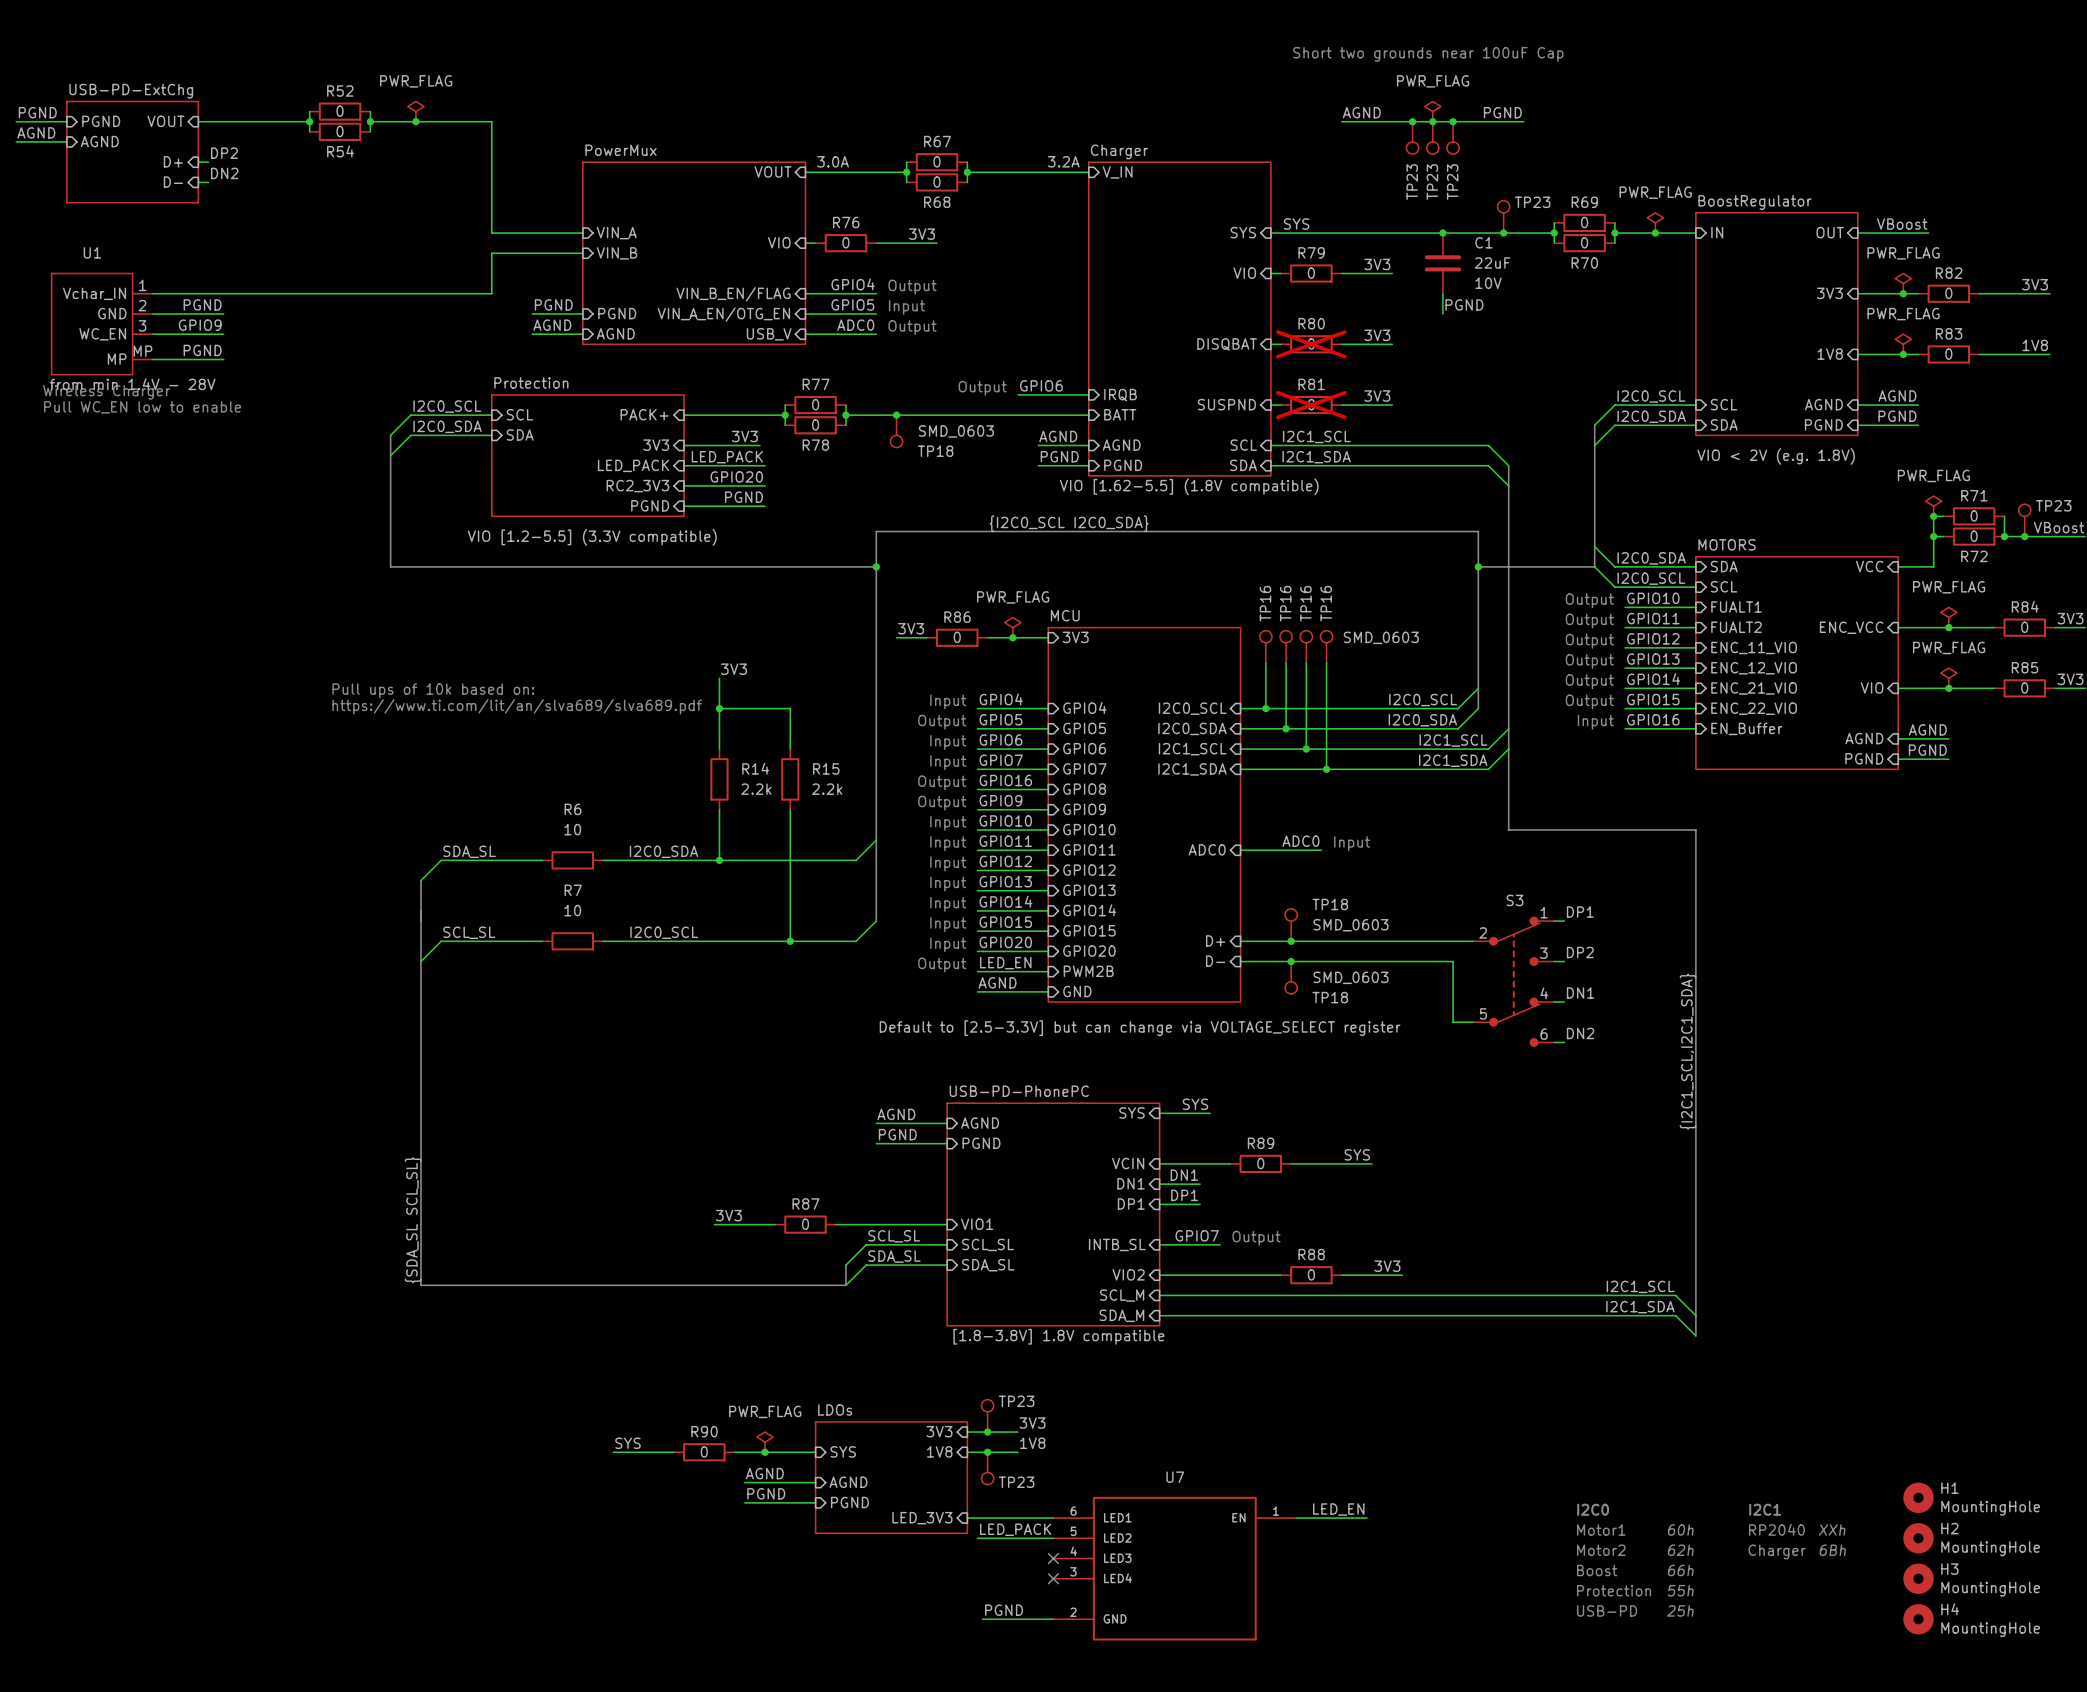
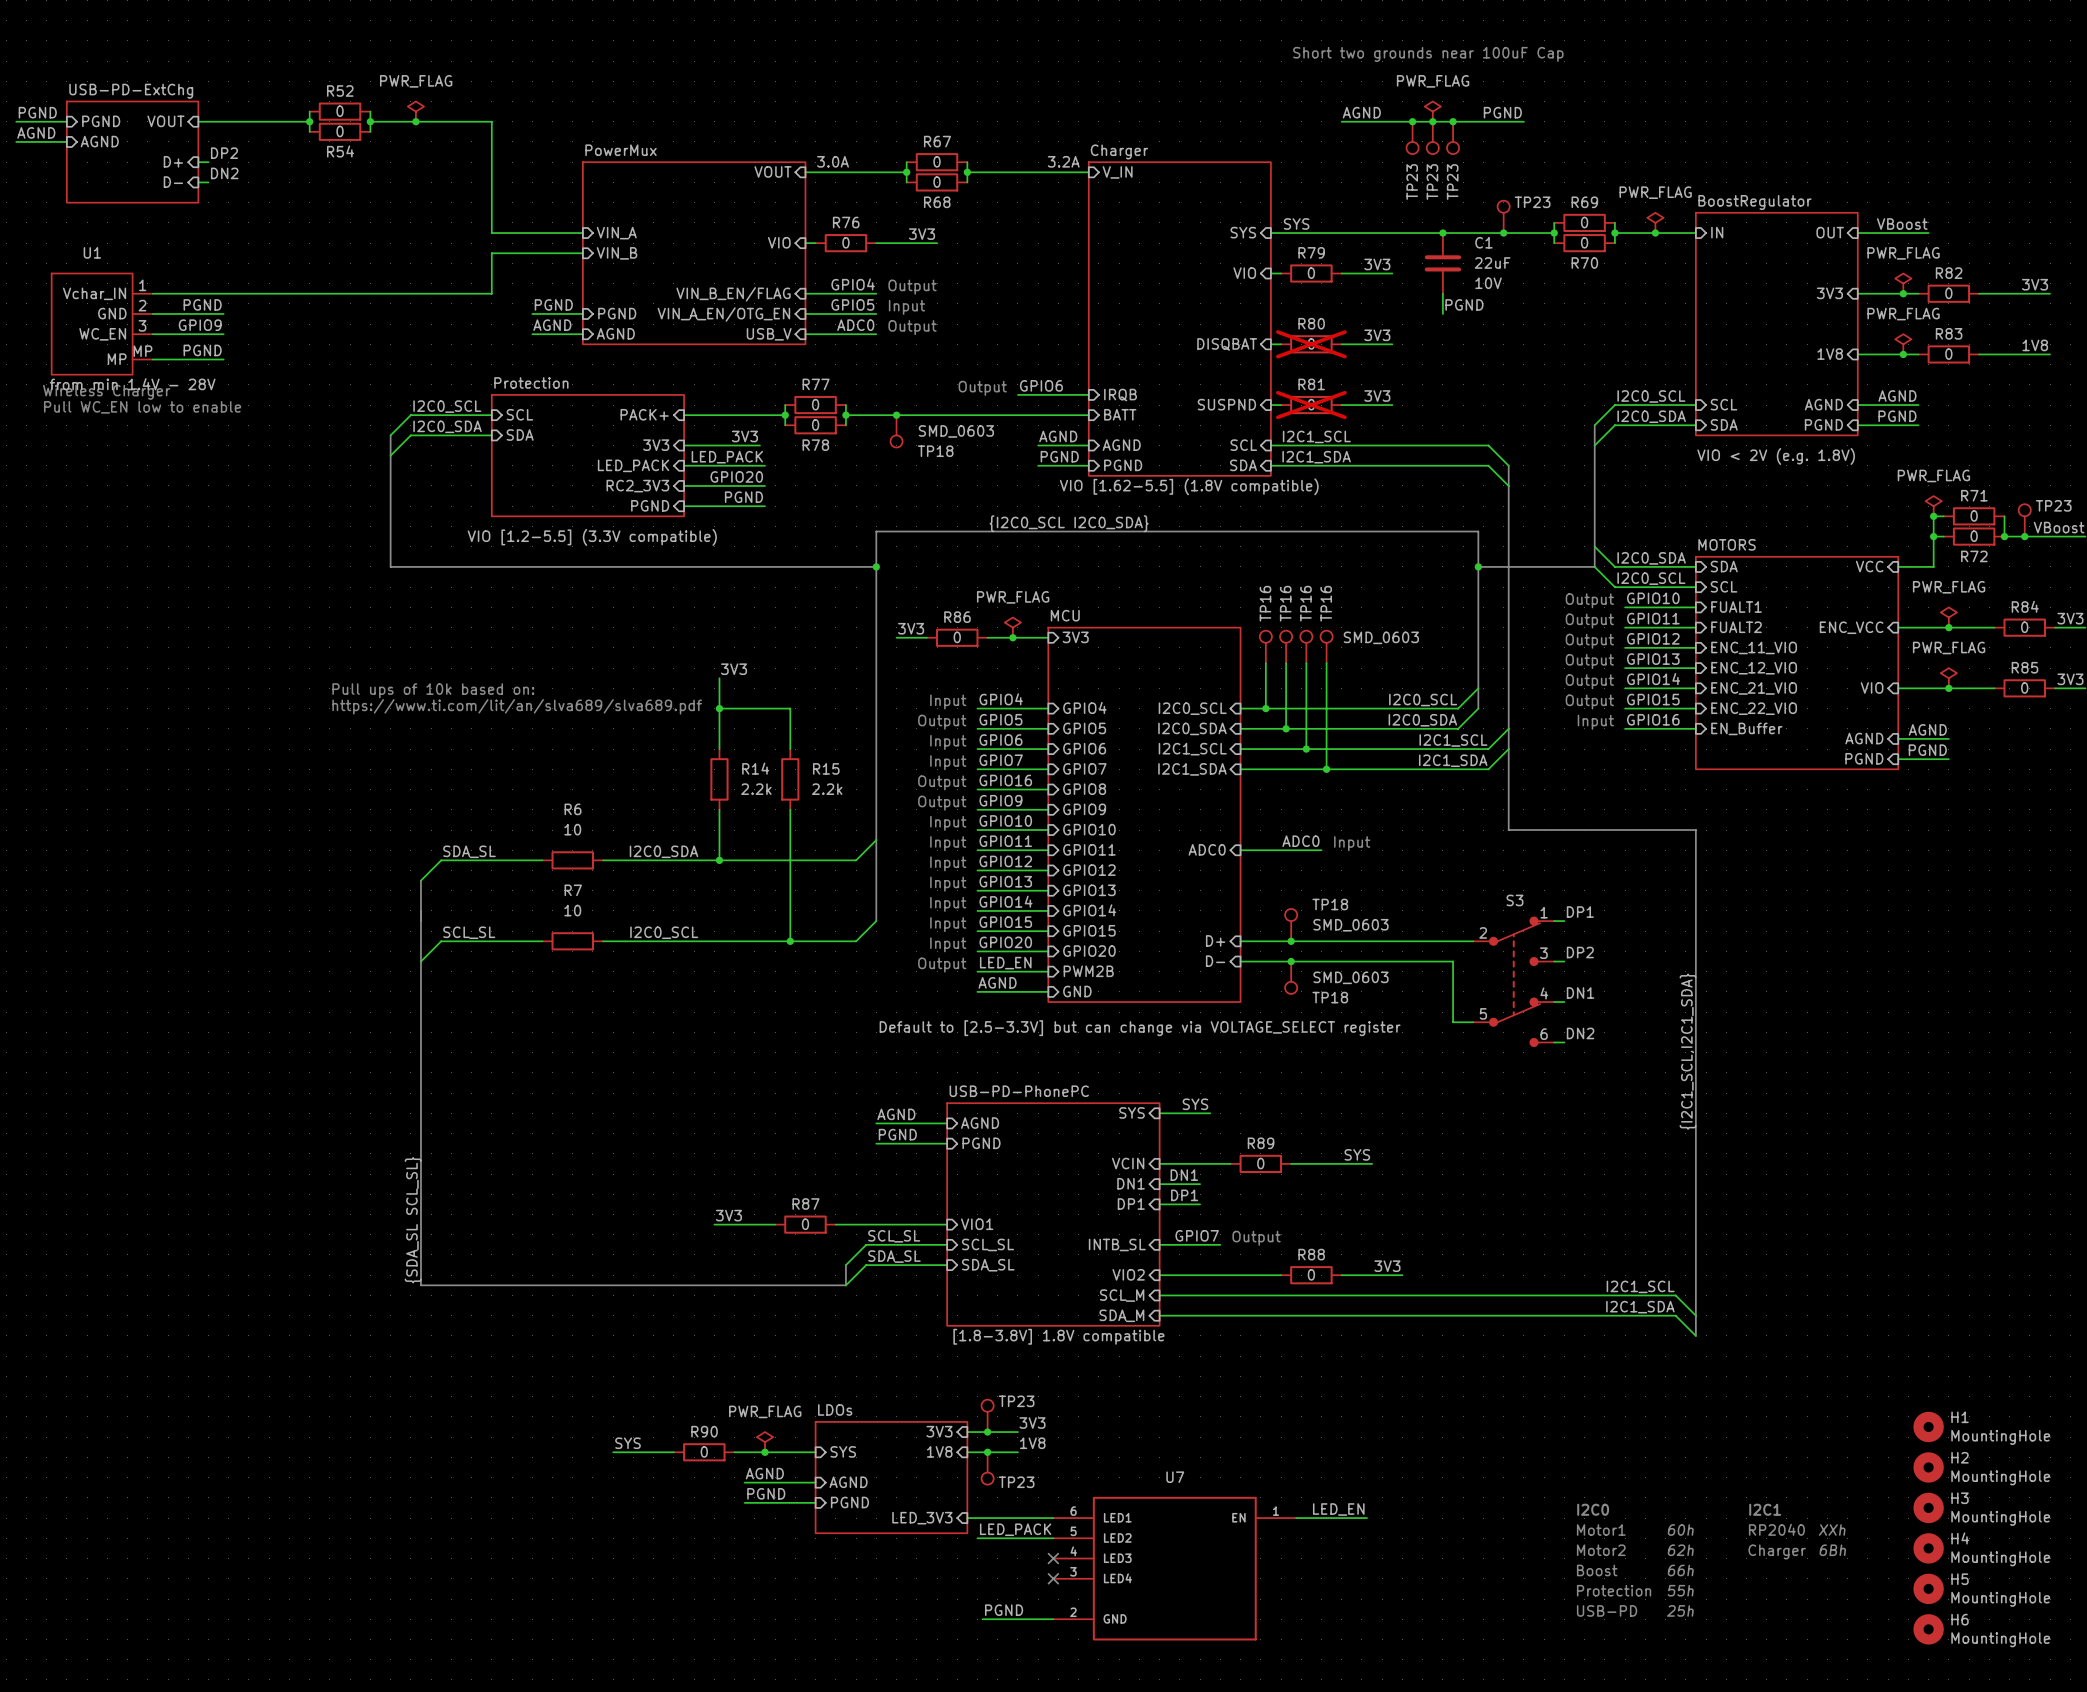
H1 position: (1918, 1497) -> (1928, 1426)
H2 position: (1918, 1538) -> (1928, 1467)
H3 position: (1918, 1578) -> (1928, 1507)
H5: none -> MountingHole (1928, 1588)
H4 position: (1918, 1619) -> (1928, 1548)
H6: none -> MountingHole (1928, 1629)

